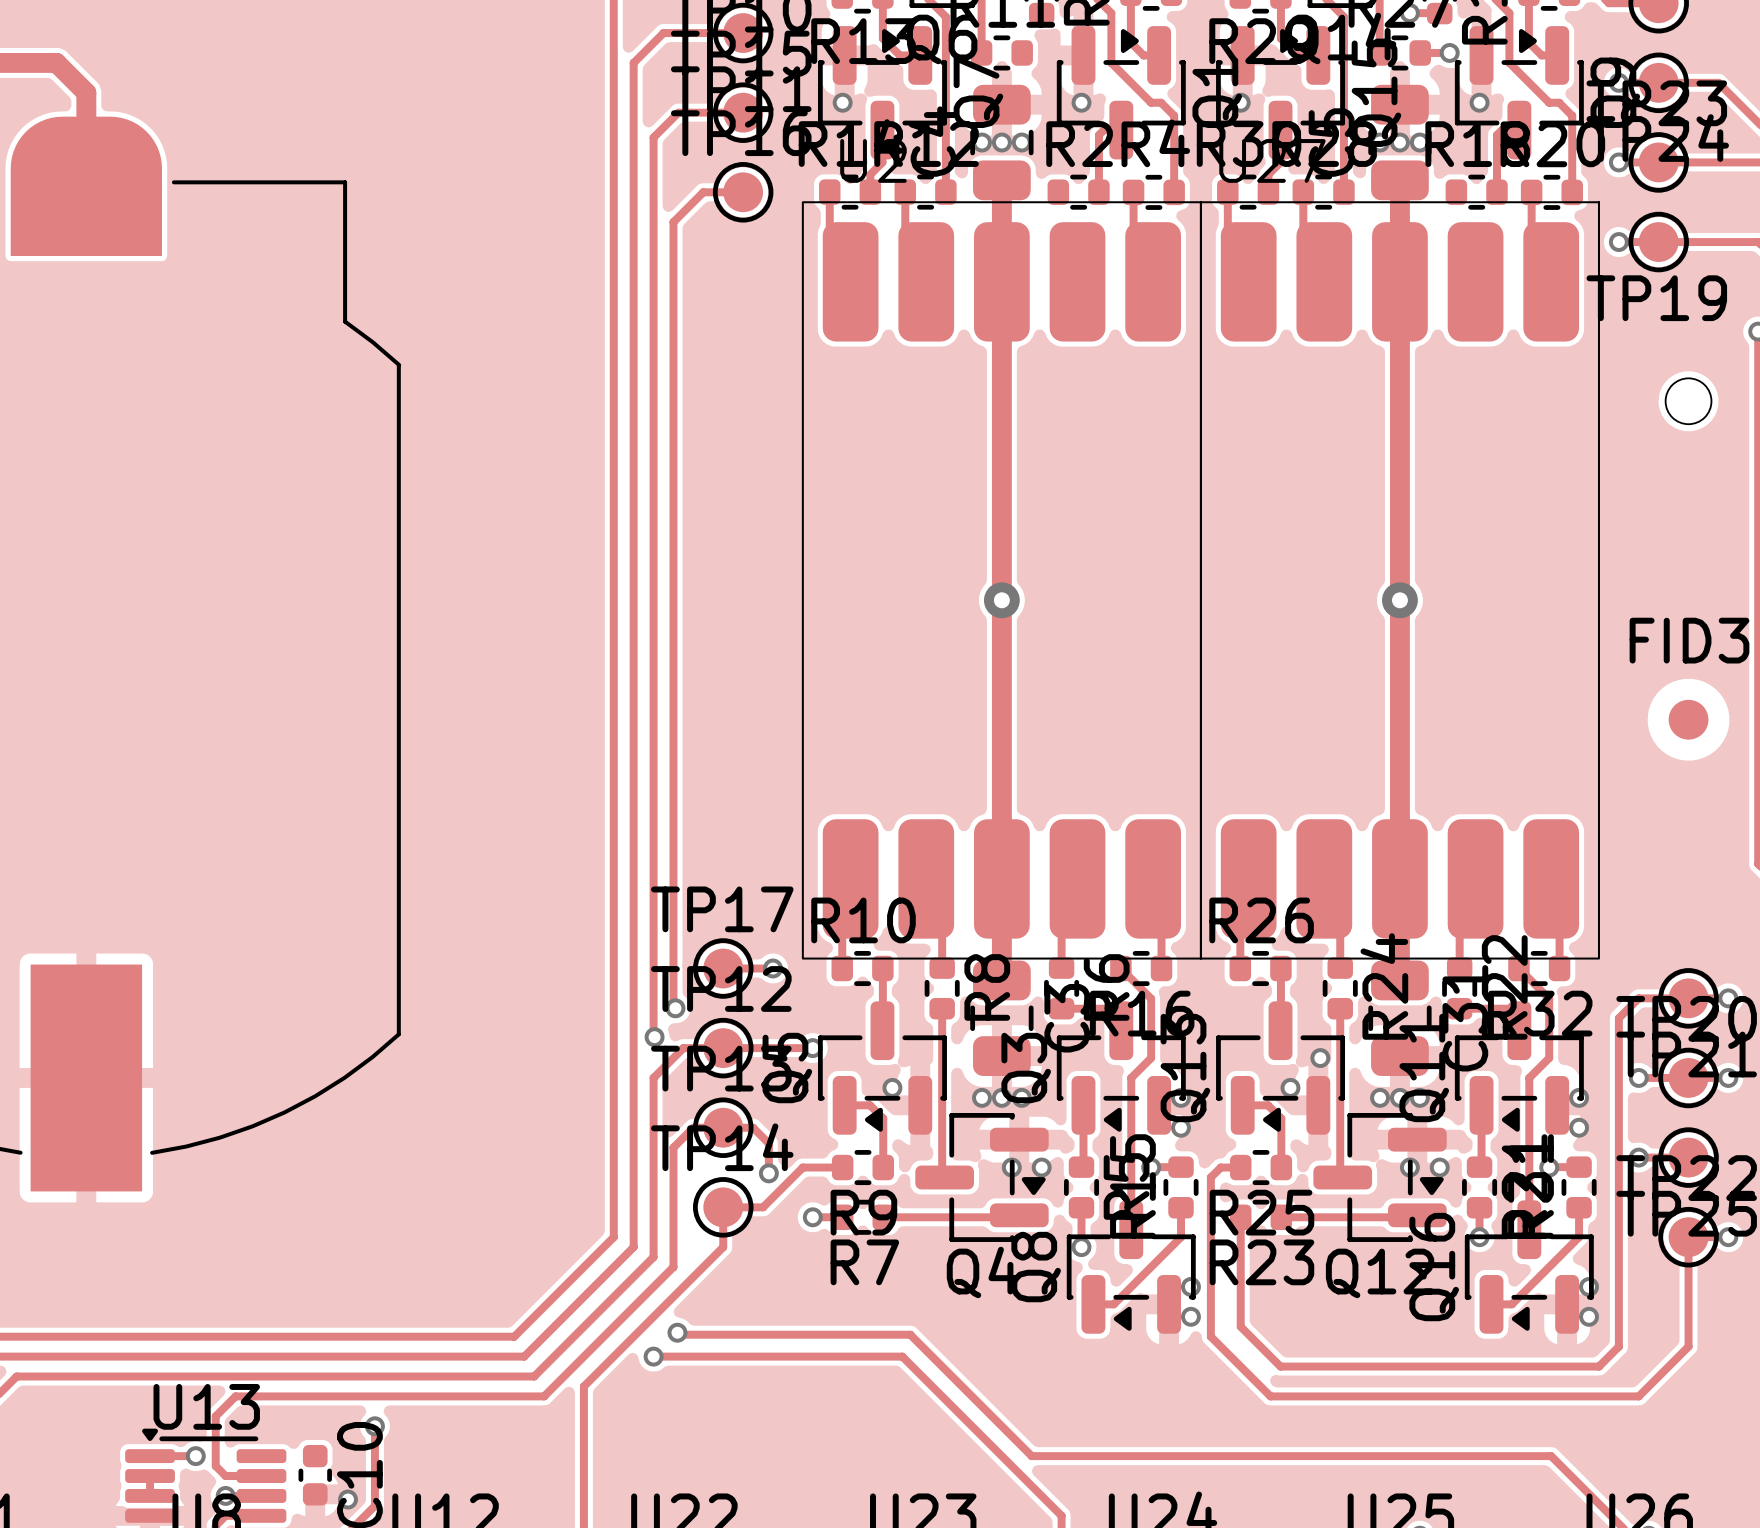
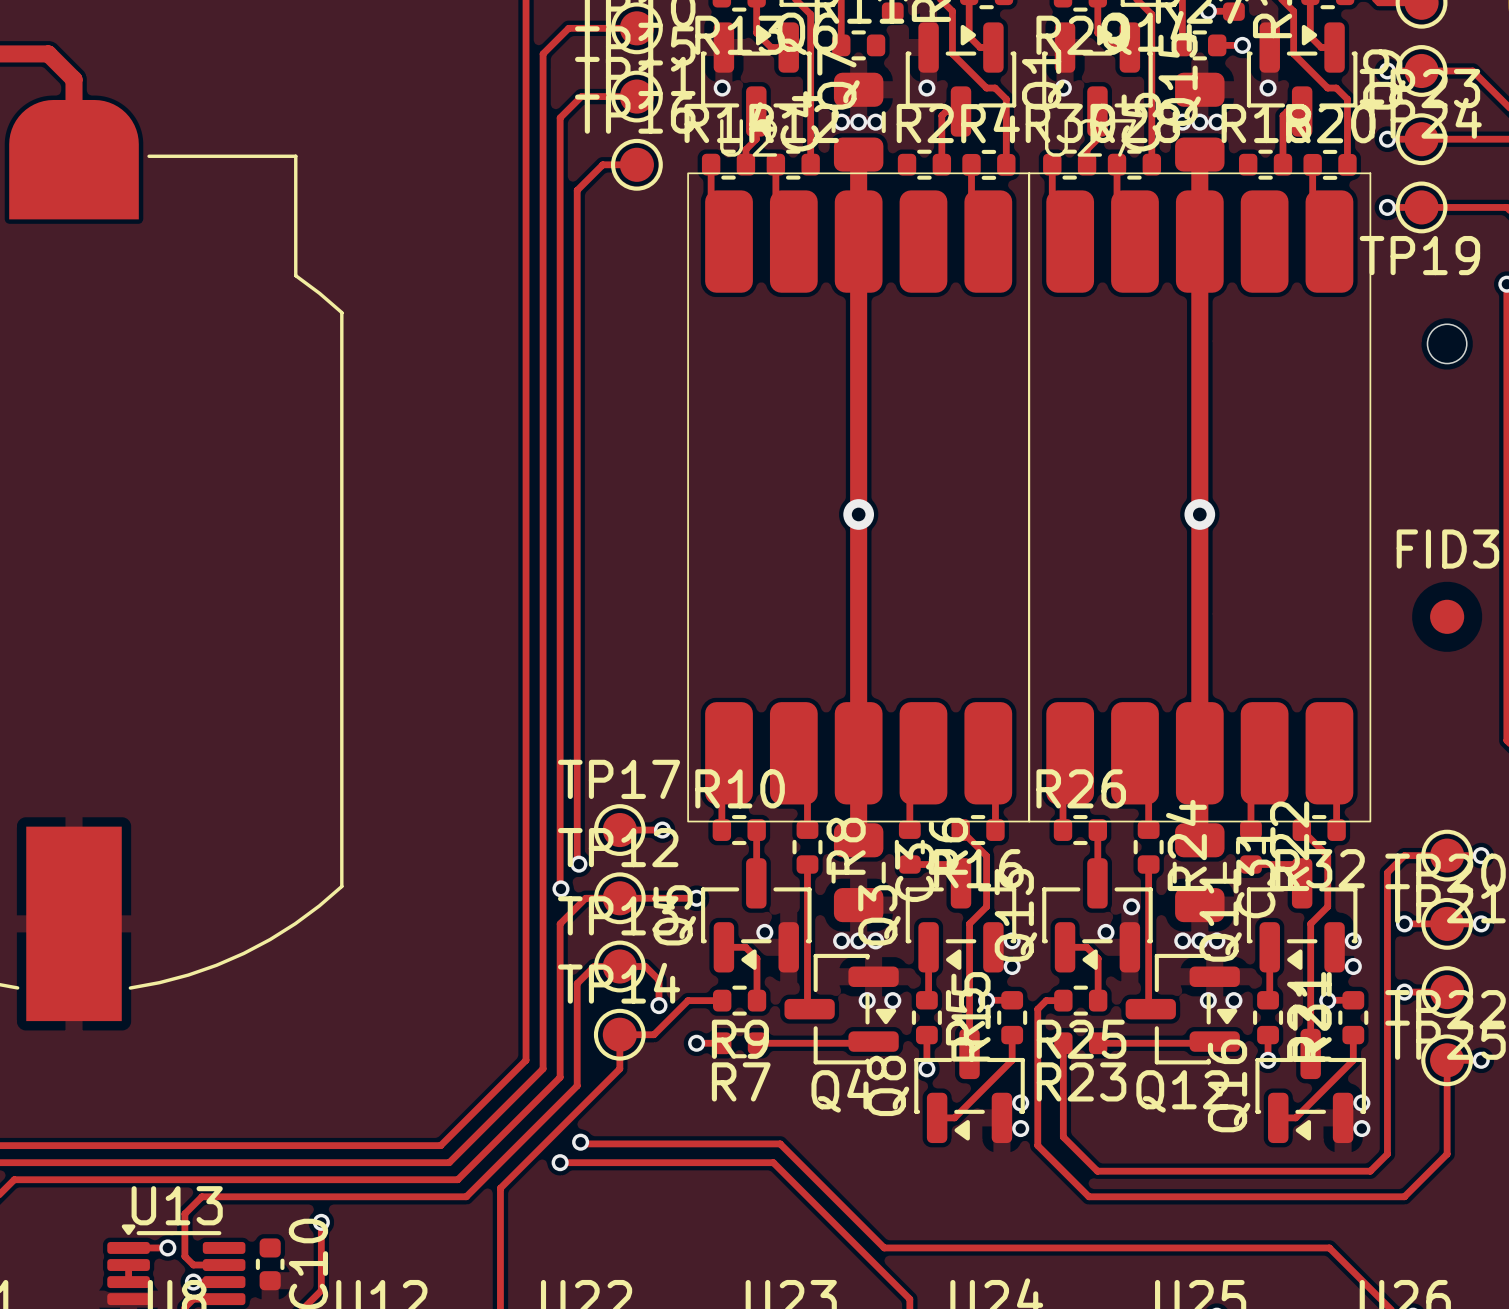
via: (348, 1499) -> none

